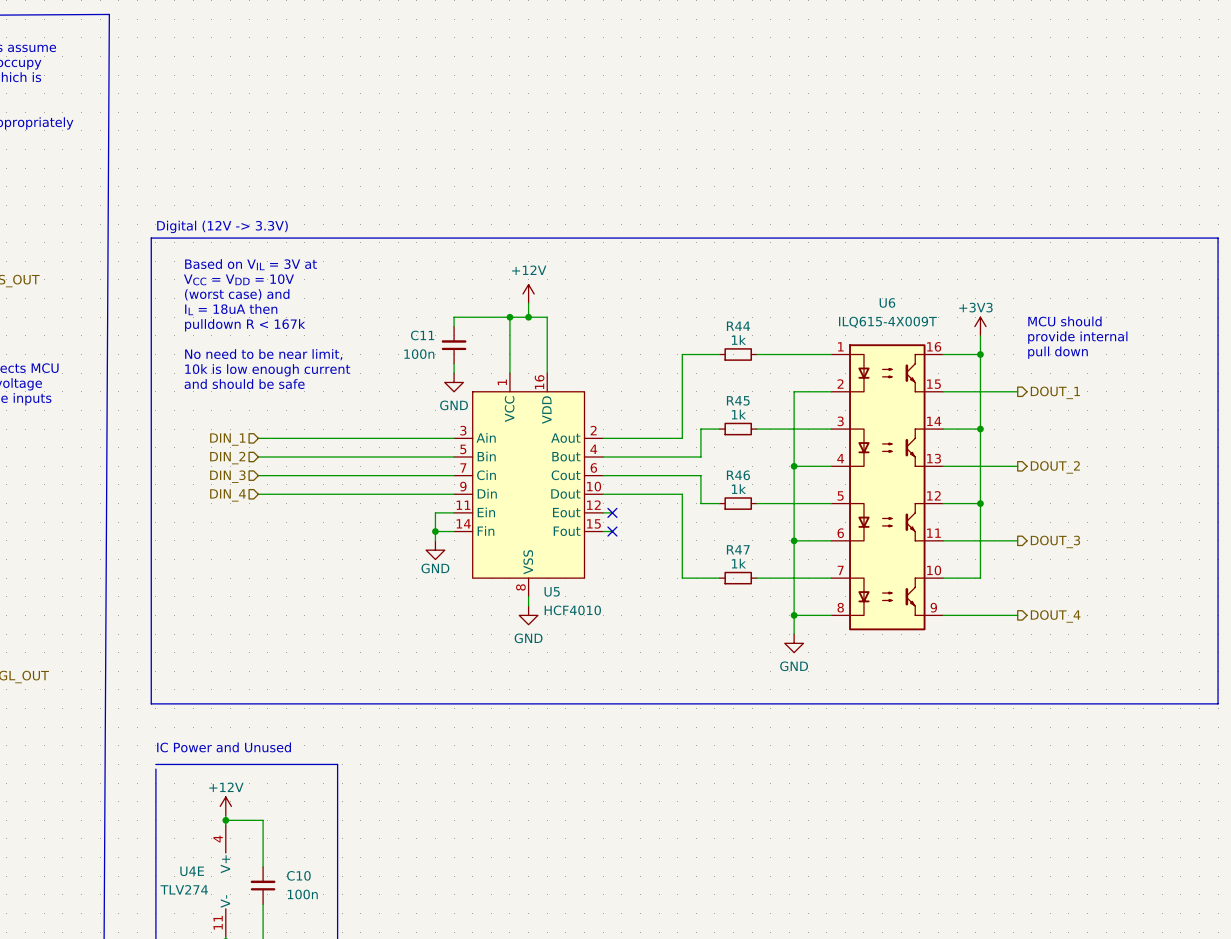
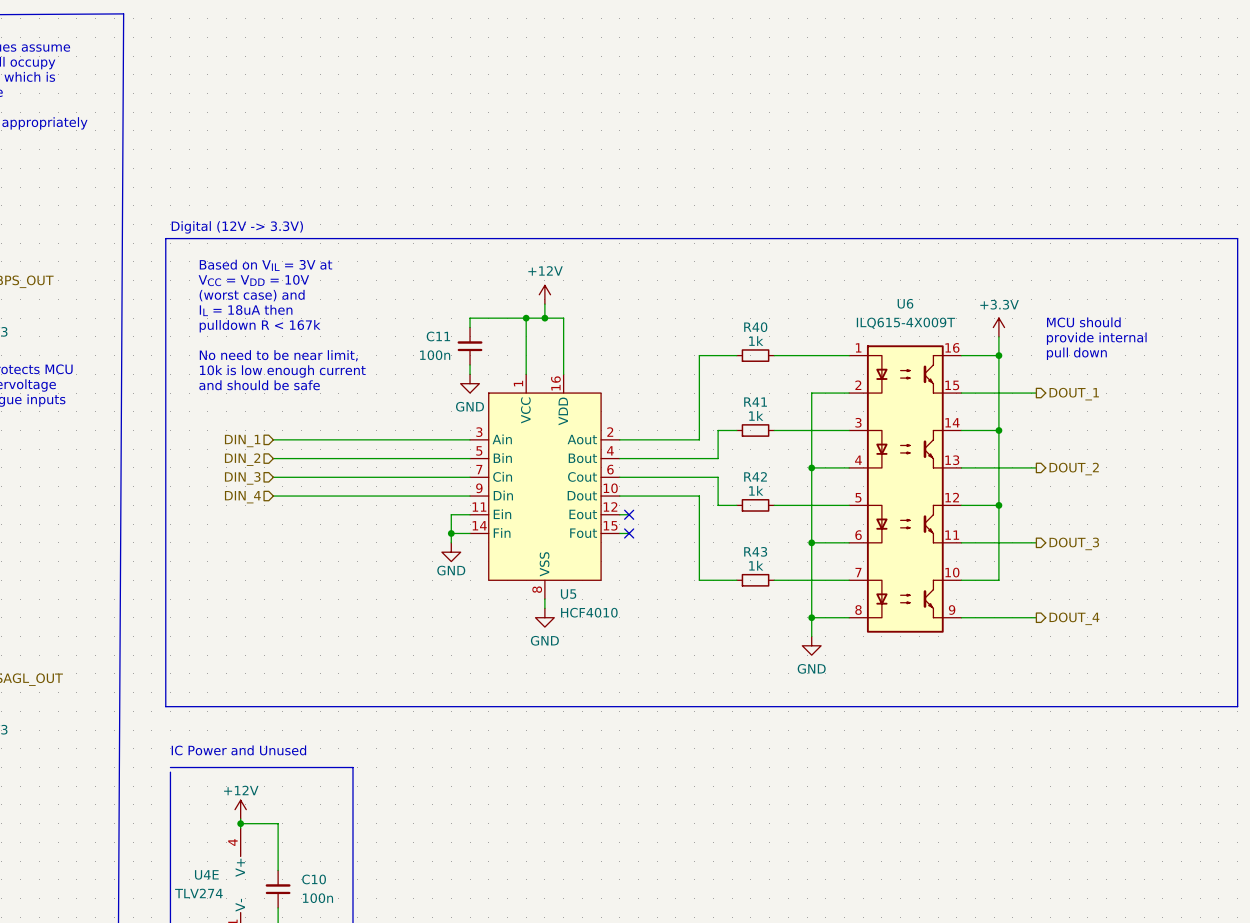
R44 name: R44 (738, 326) -> R40 (755, 327)
power symbol: +3V3 (980, 326) -> +3.3V (998, 327)
R45 name: R45 (738, 400) -> R41 (755, 402)
R46 name: R46 (738, 475) -> R42 (755, 476)
R47 name: R47 (738, 549) -> R43 (755, 551)

